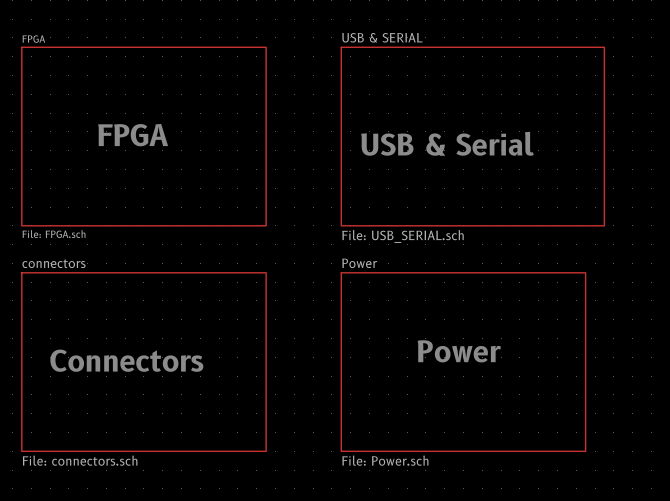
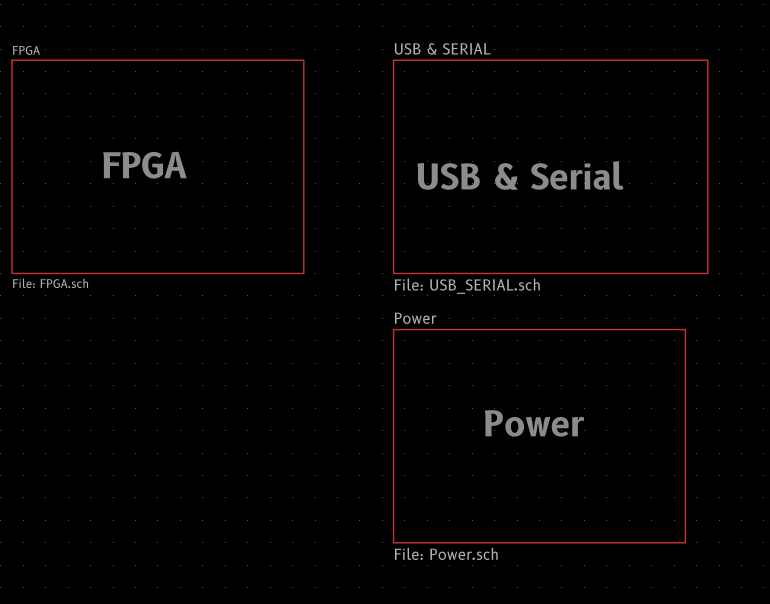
text: Connectors (126, 360) -> none
sheet connectors: File: connectors.sch (143, 362) -> none

